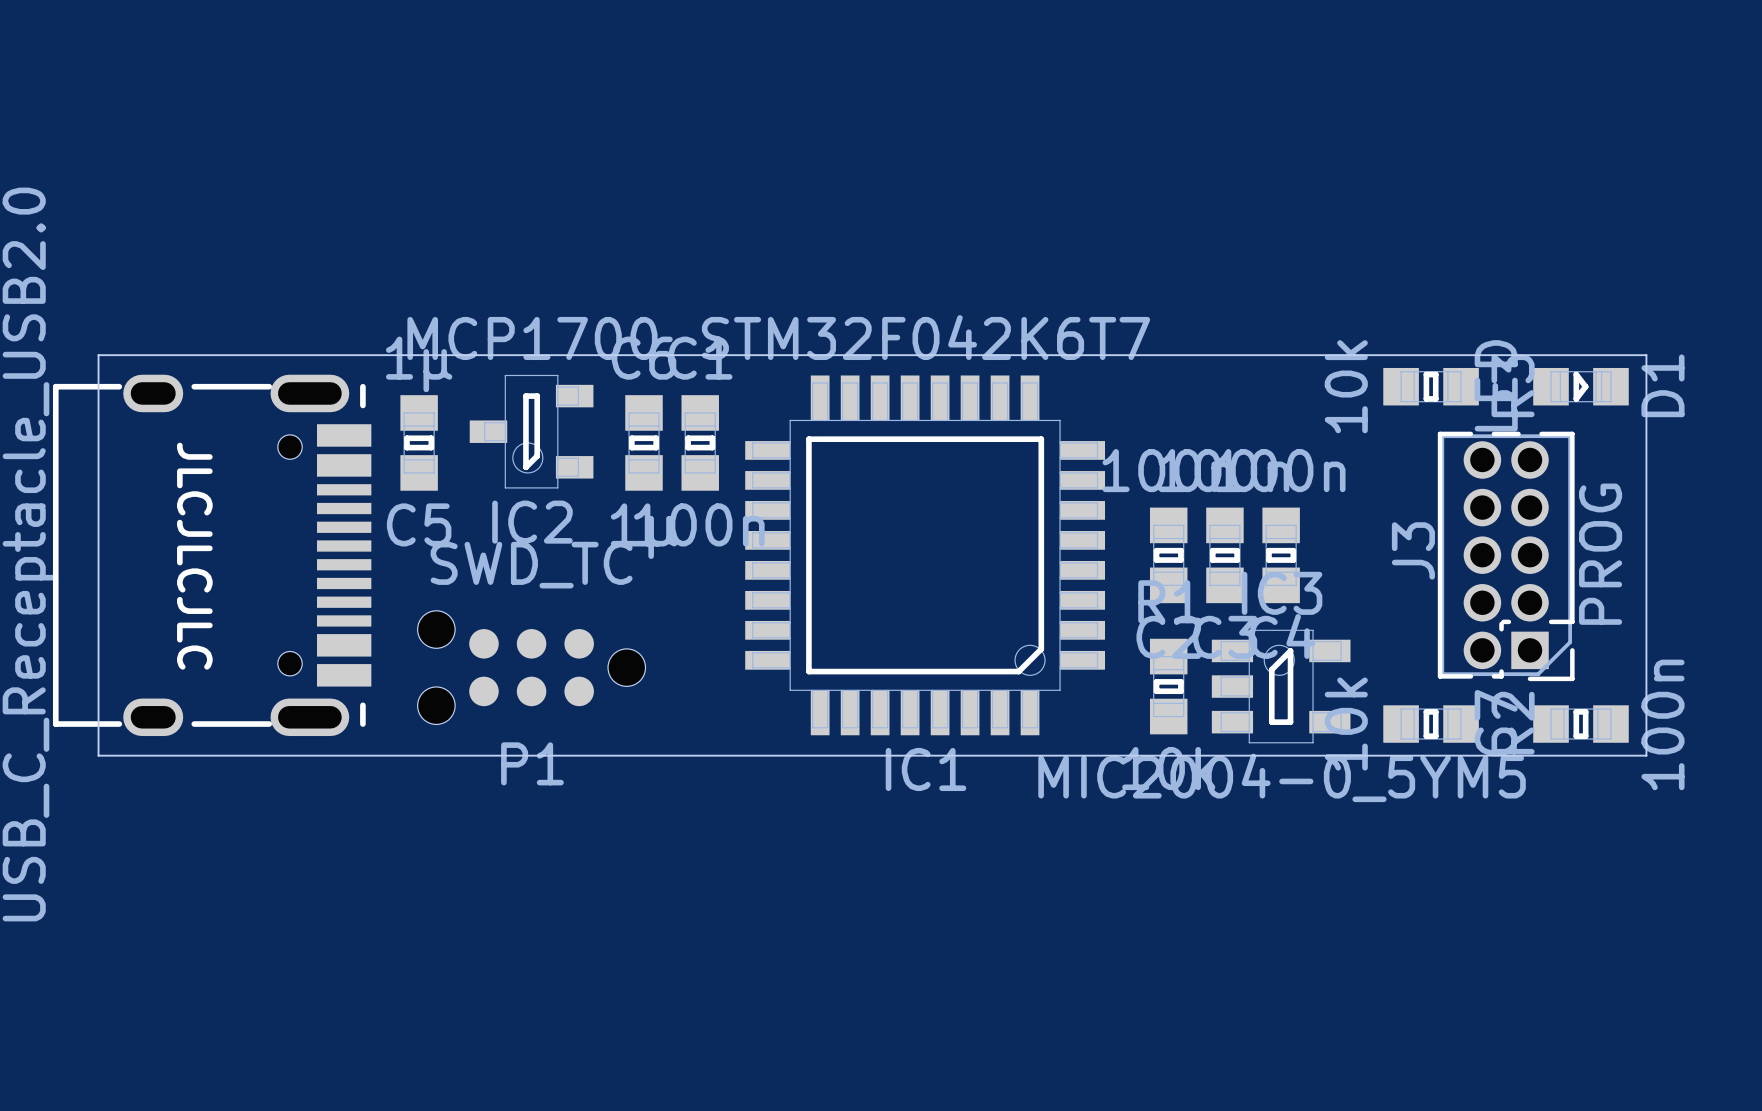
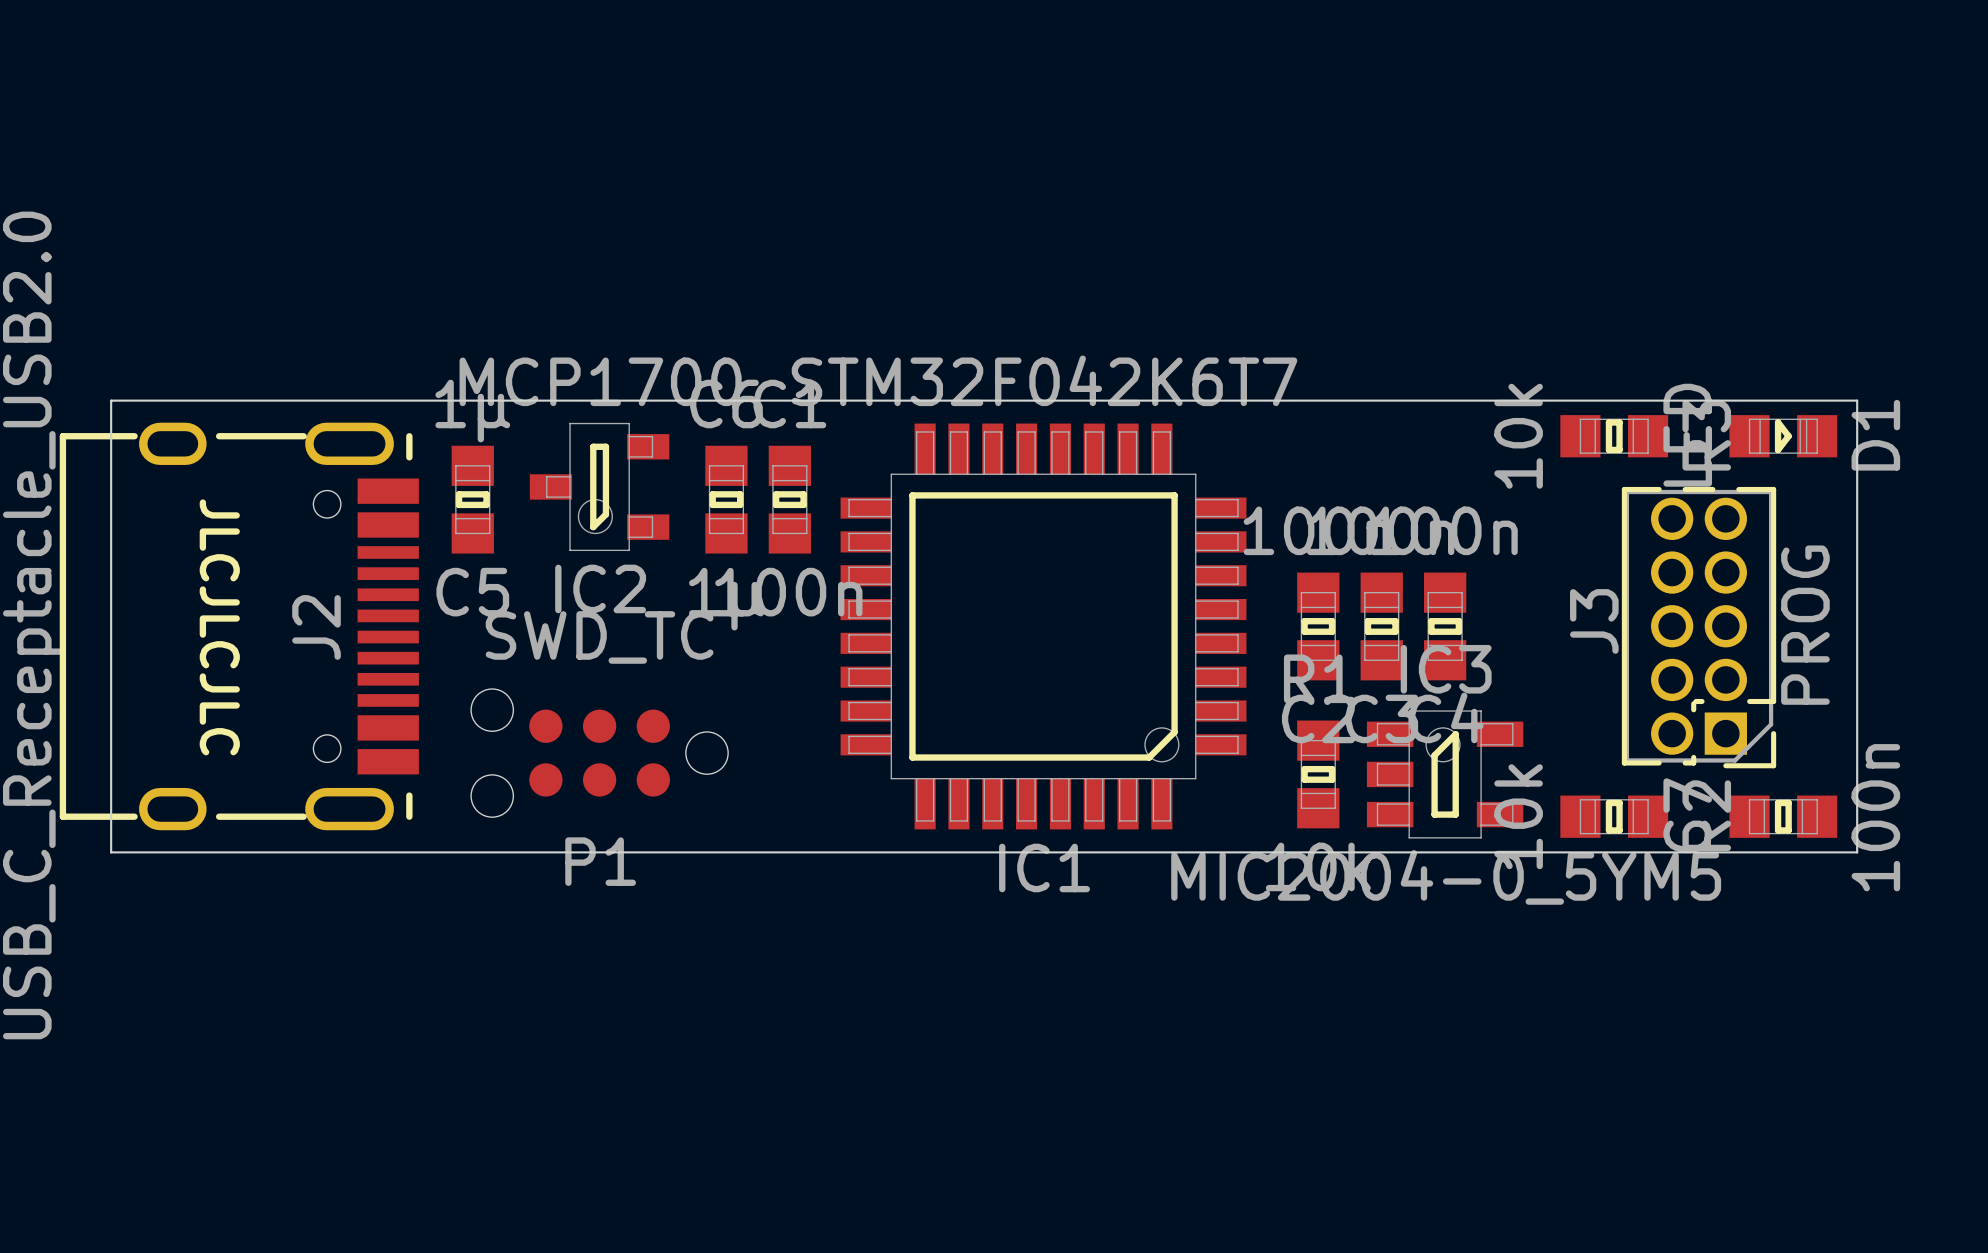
J2 name: none -> J2 (316, 627)

